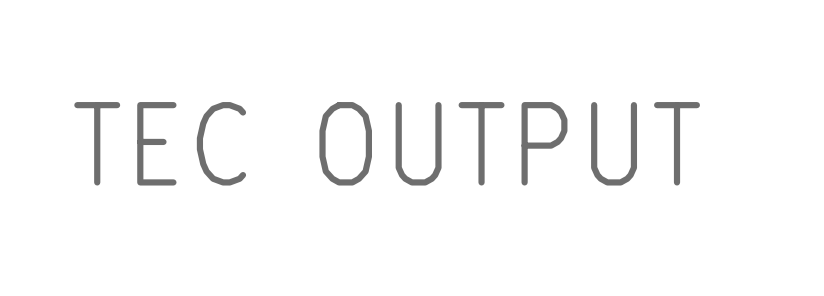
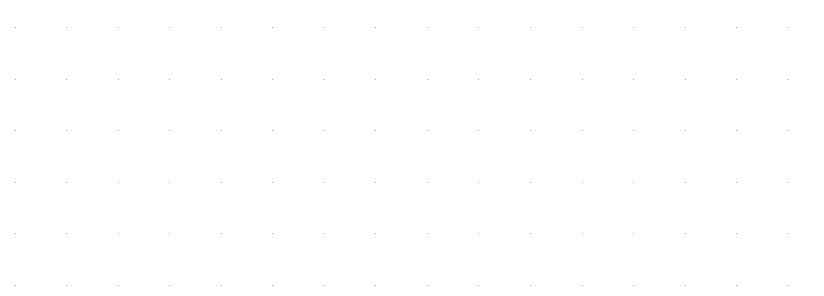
text: TEC OUTPUT (387, 143) -> none

